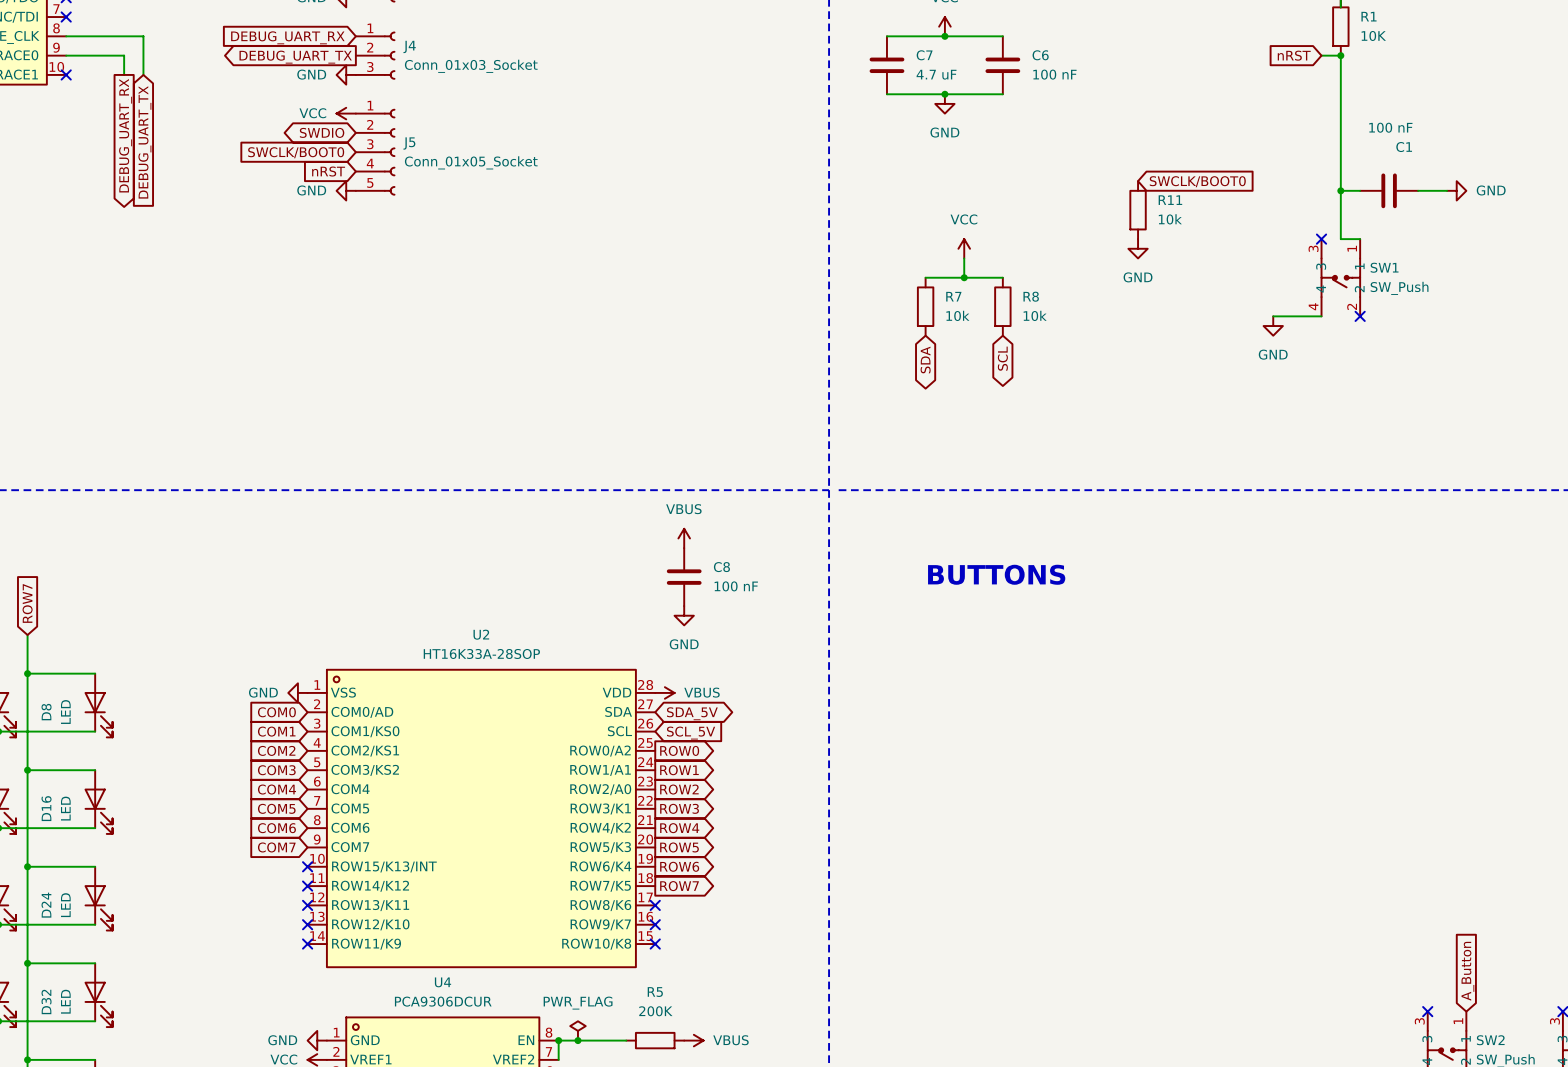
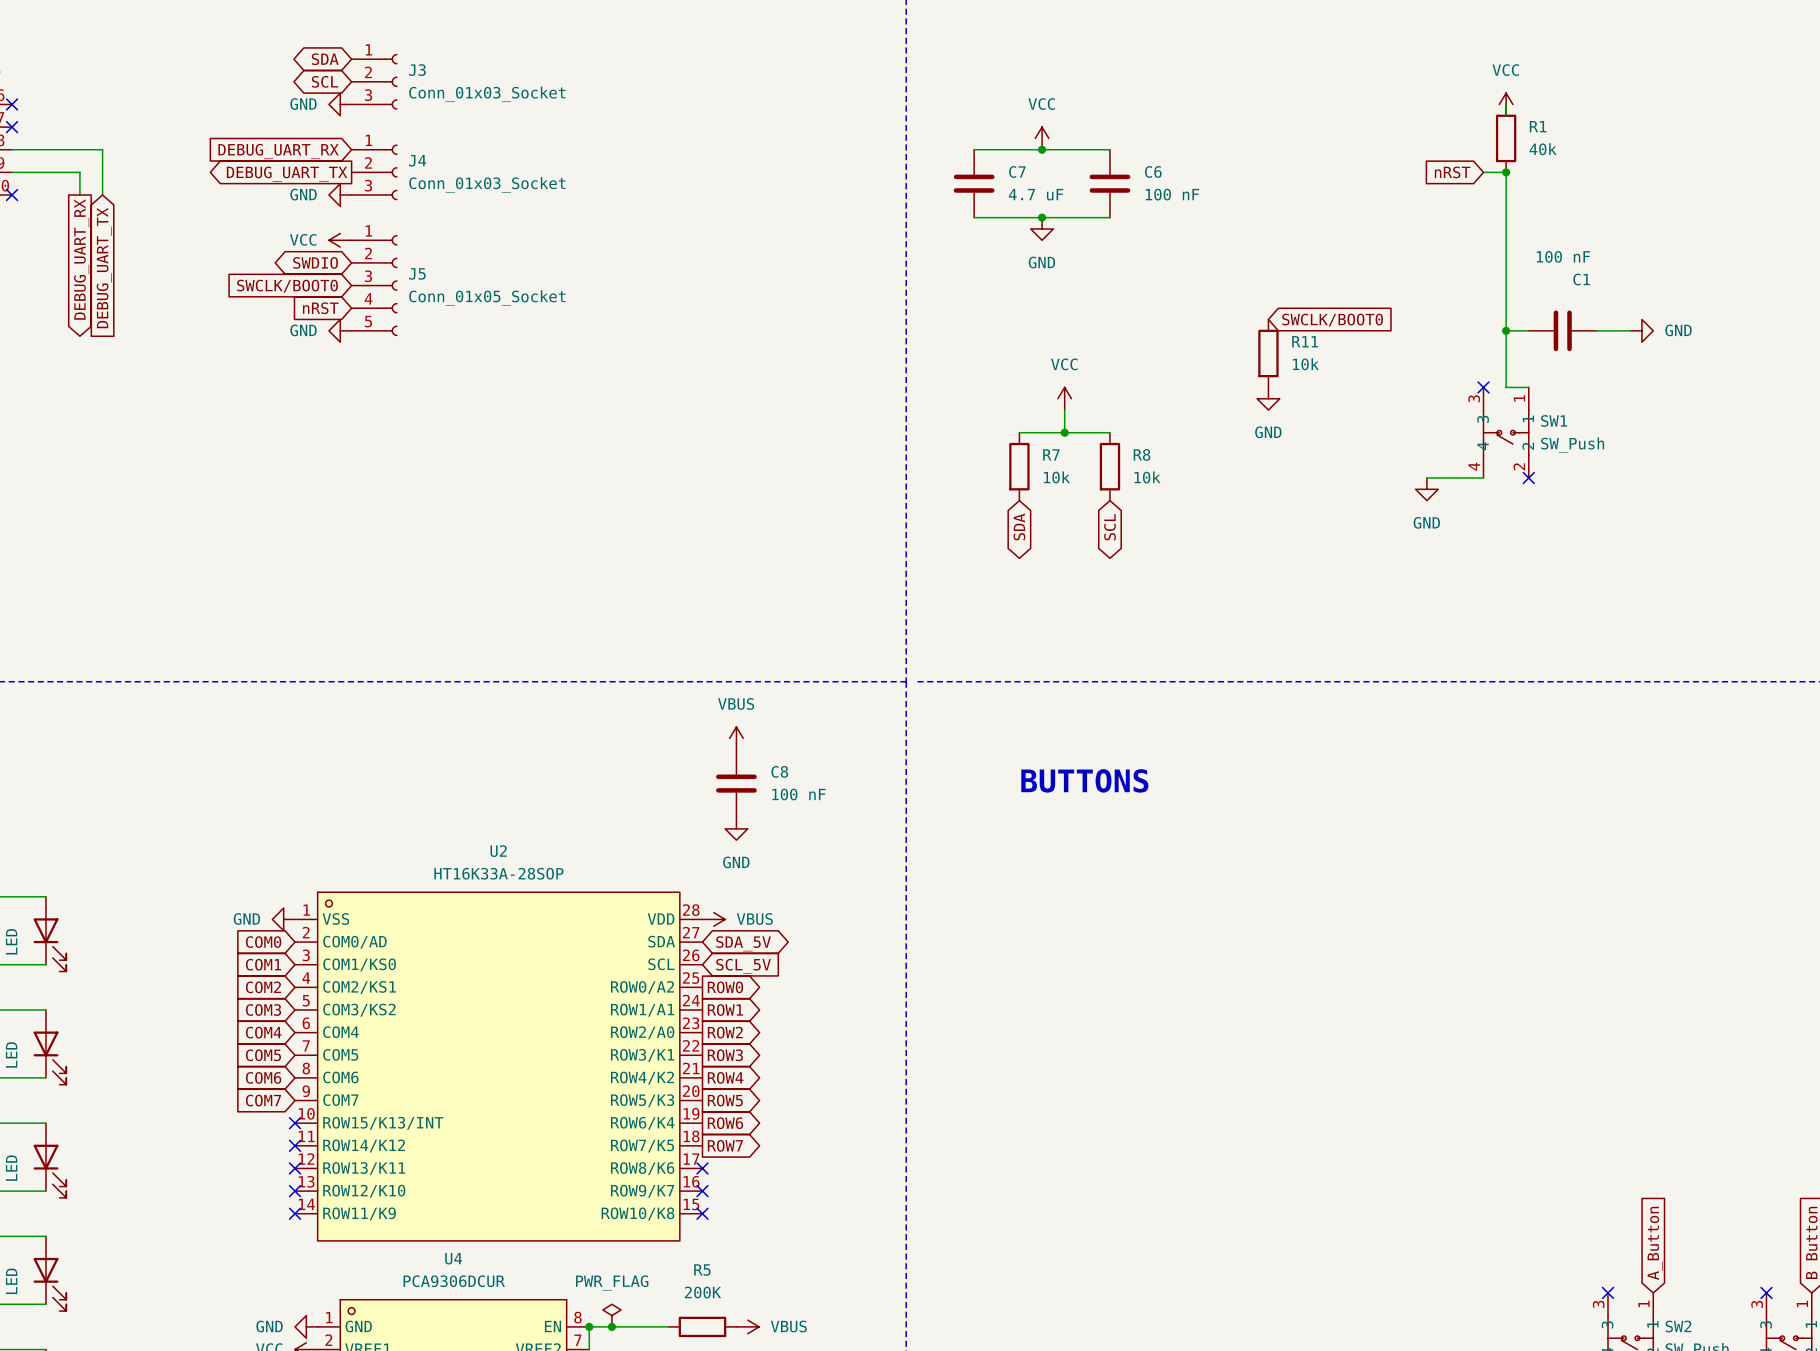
R1 value: 10K (1373, 35) -> 40k (1543, 149)

